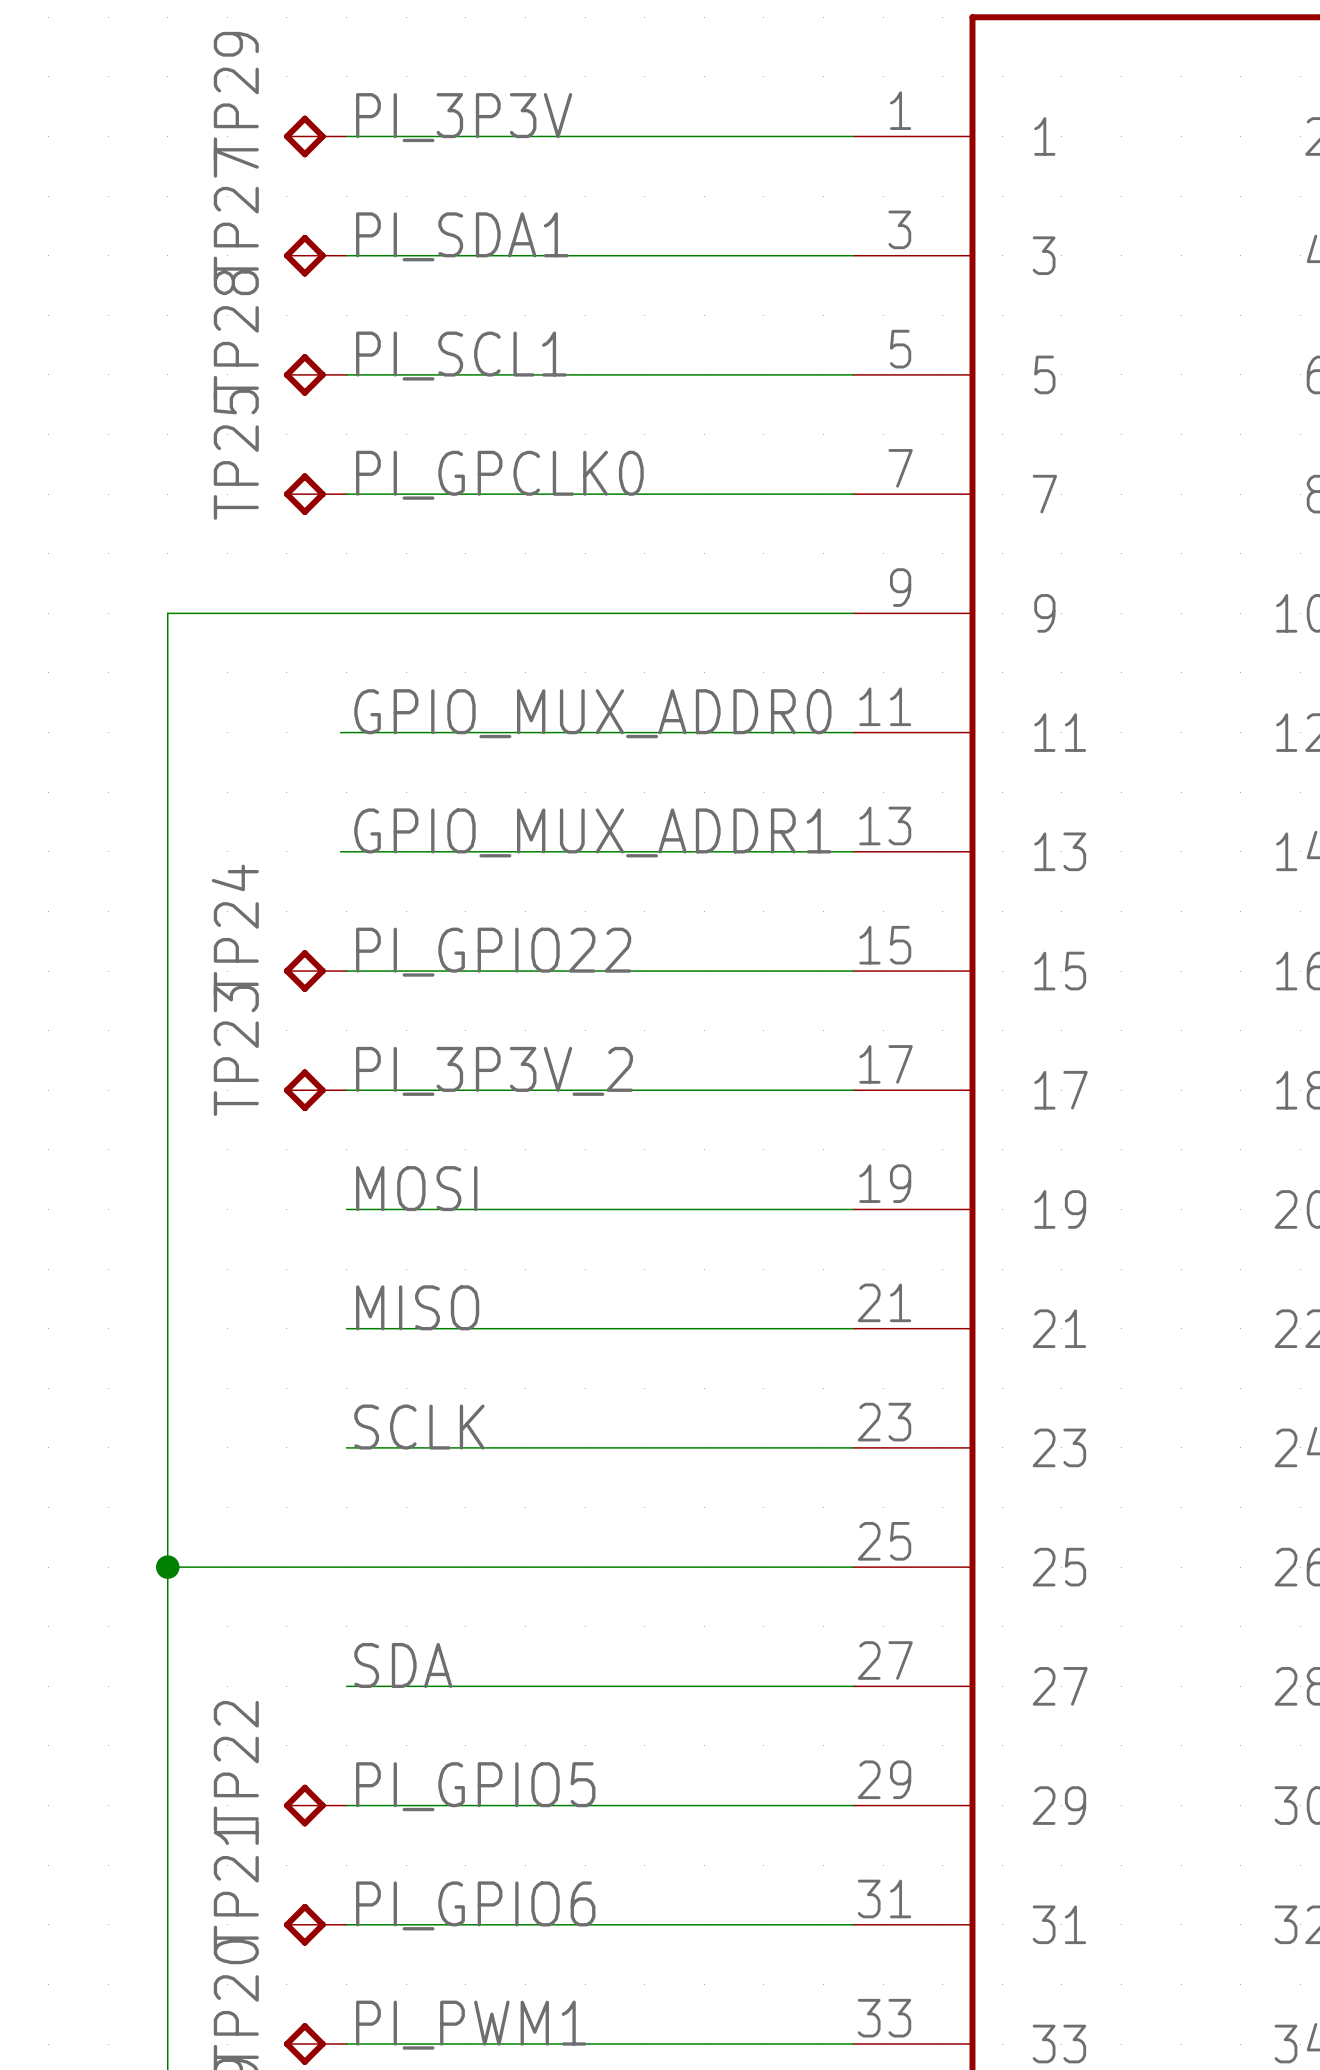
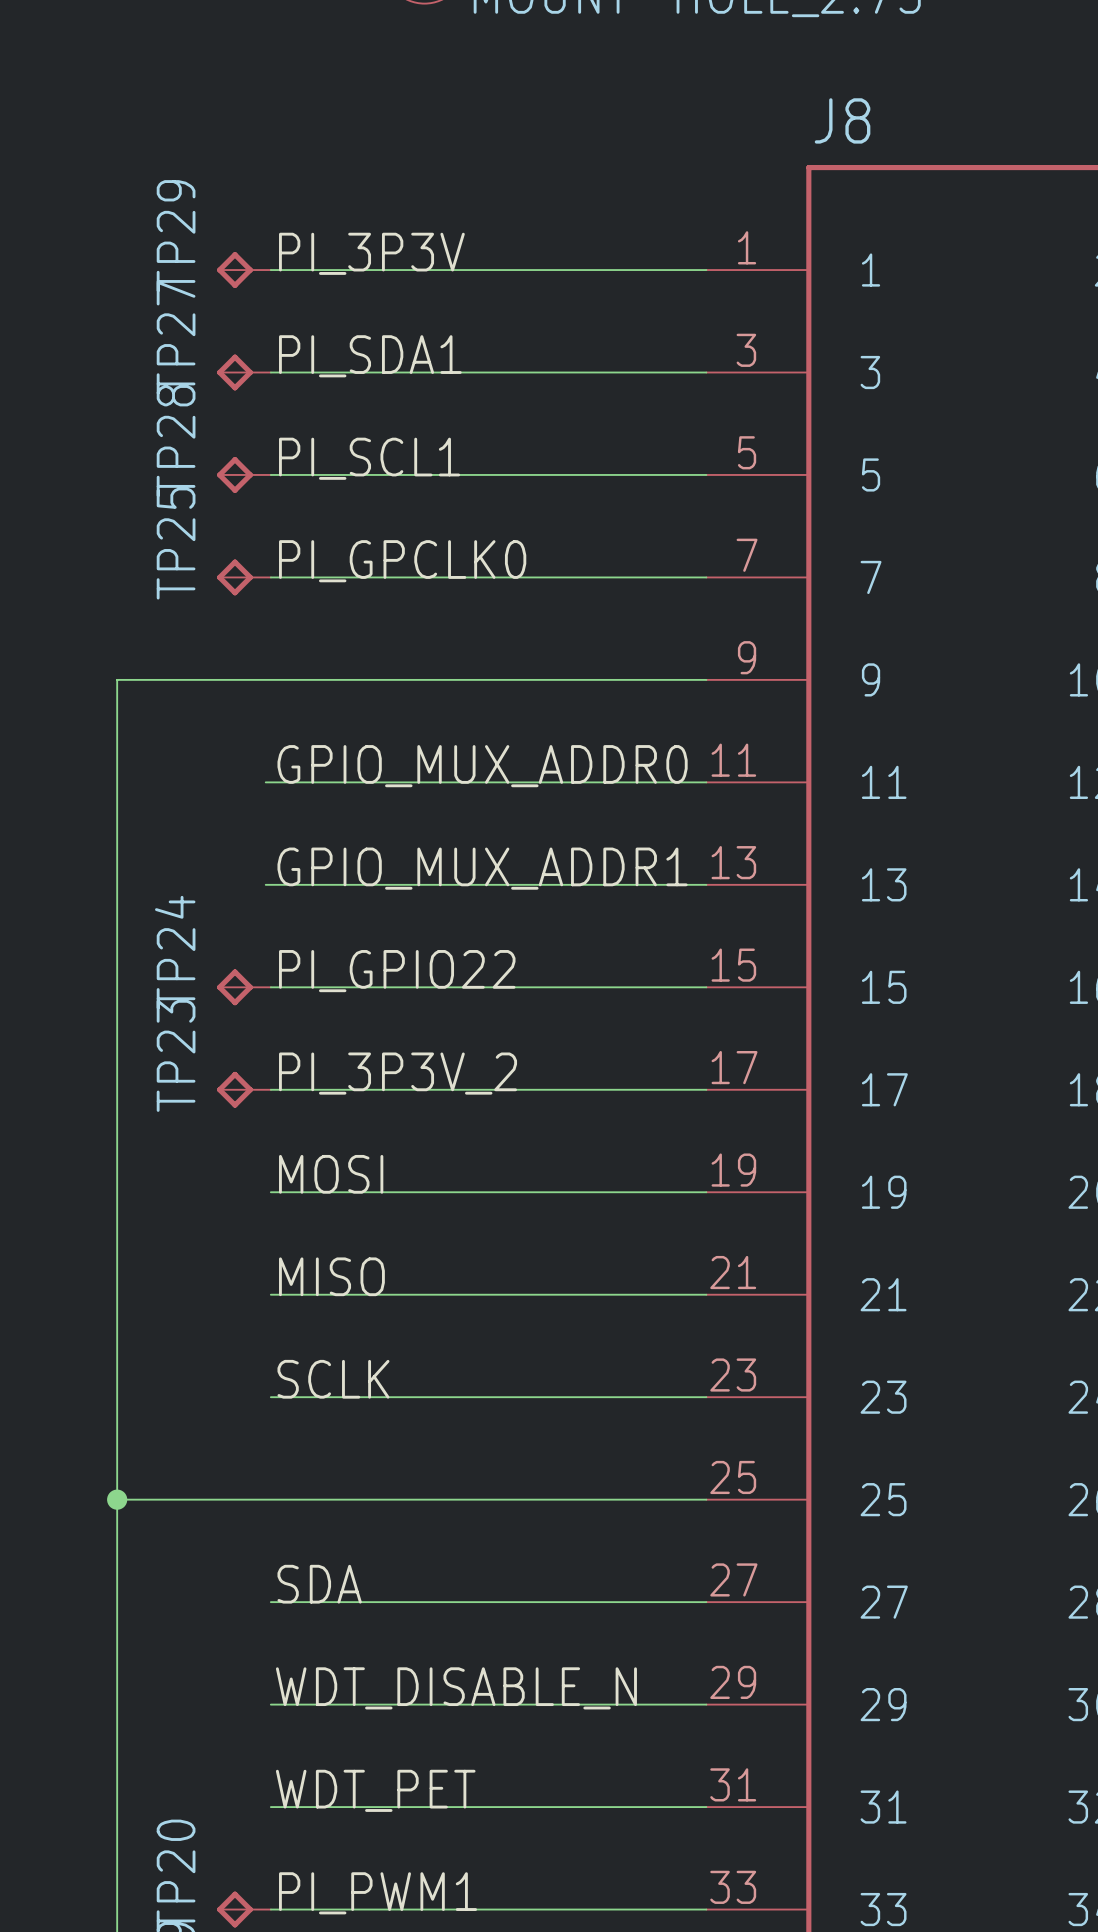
label: PI_GPIO5 (475, 1786) -> WDT_DISABLE_N (456, 1688)
TP22: (315, 1805) -> none
label: PI_GPIO6 (475, 1905) -> WDT_PET (375, 1790)
TP21: (315, 1924) -> none

